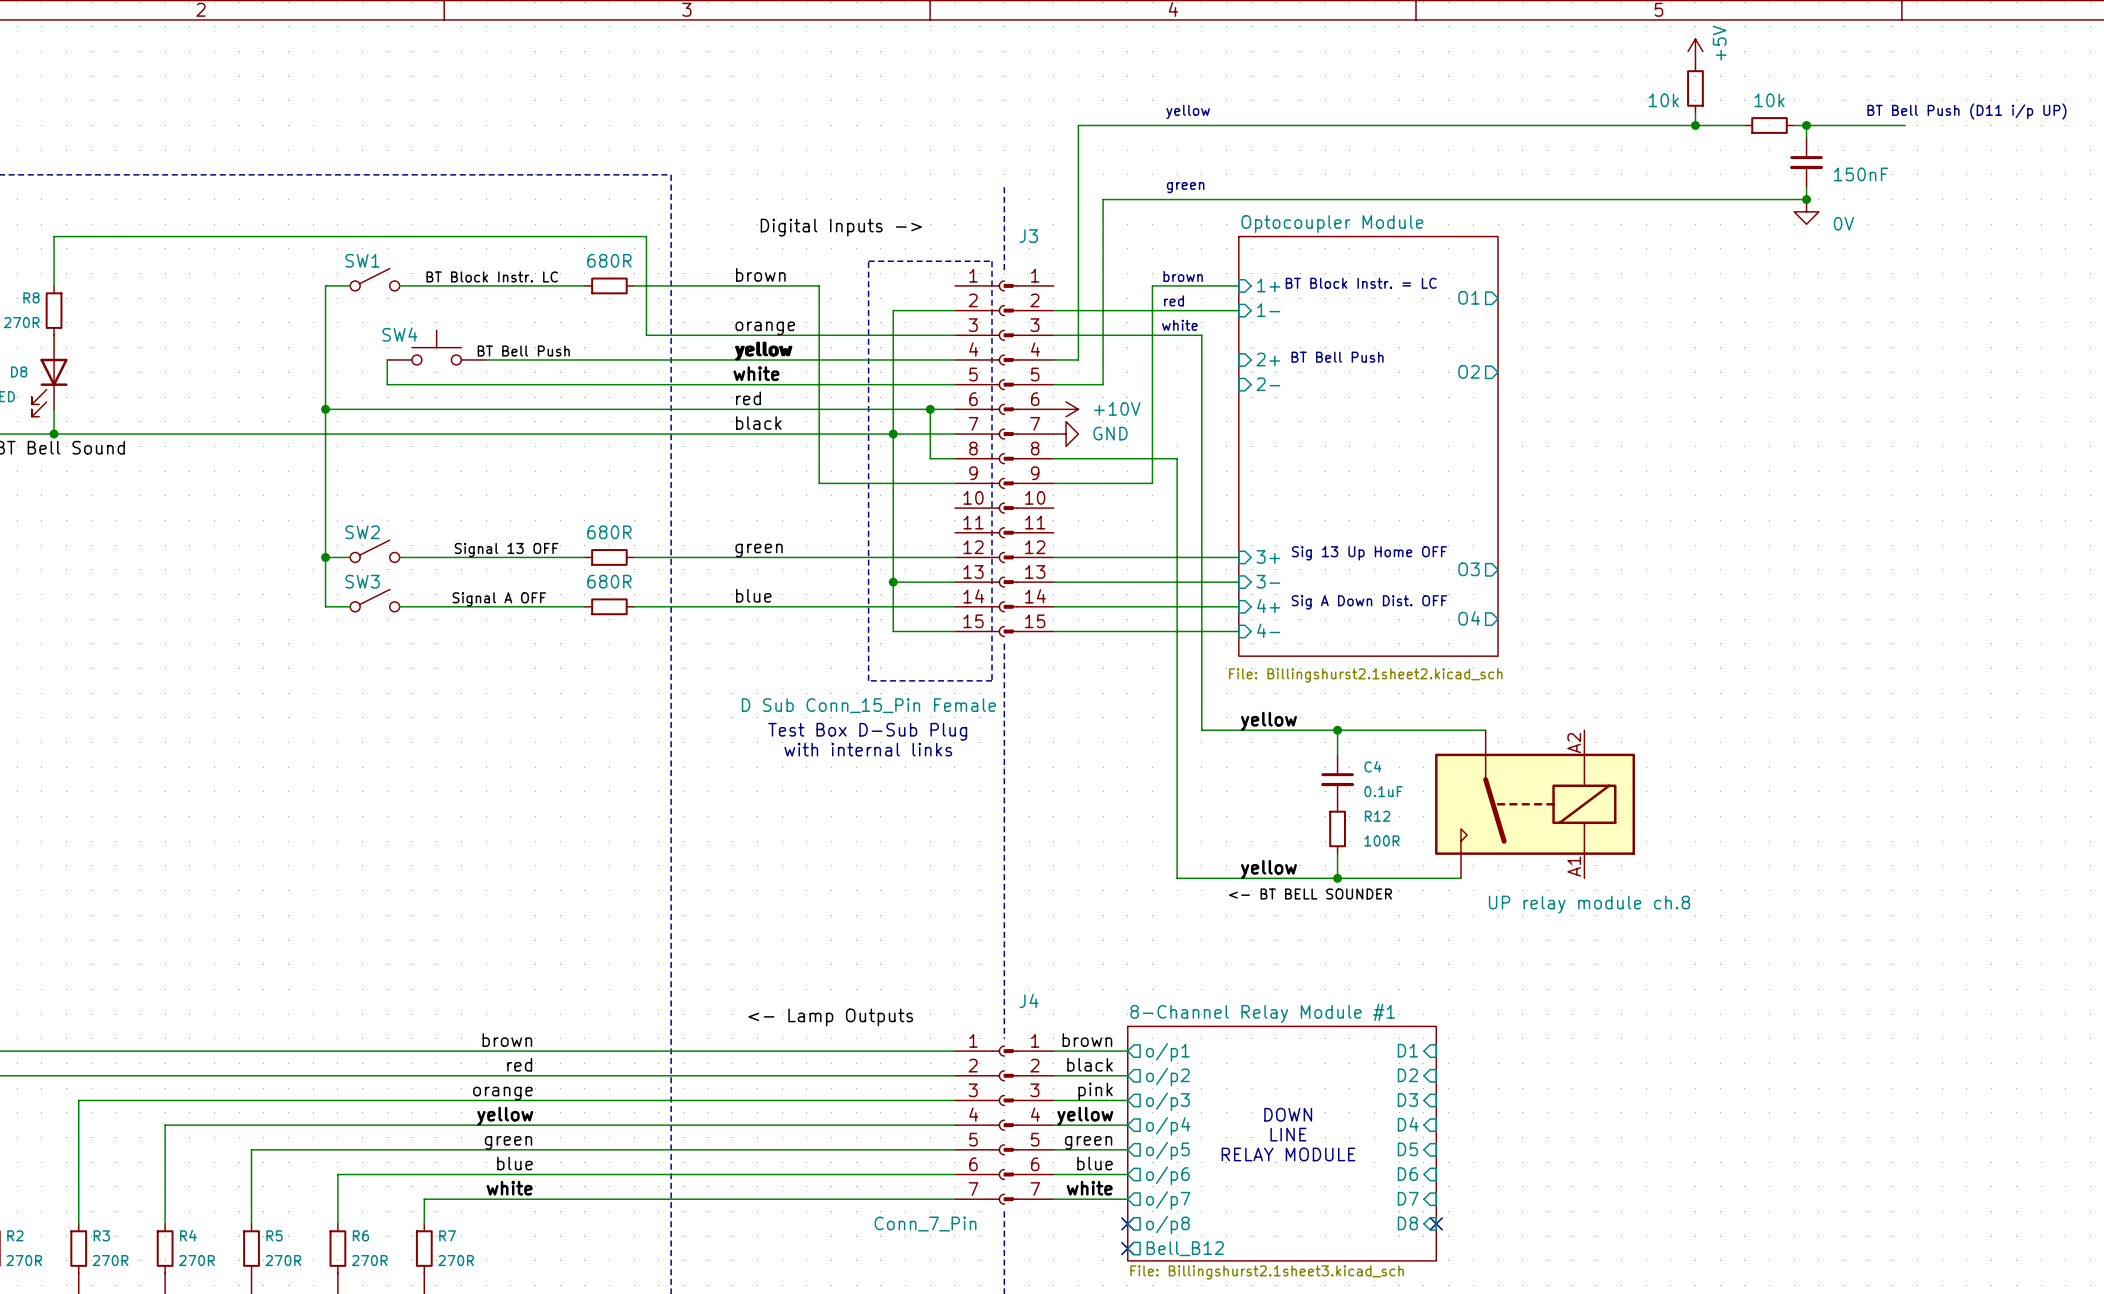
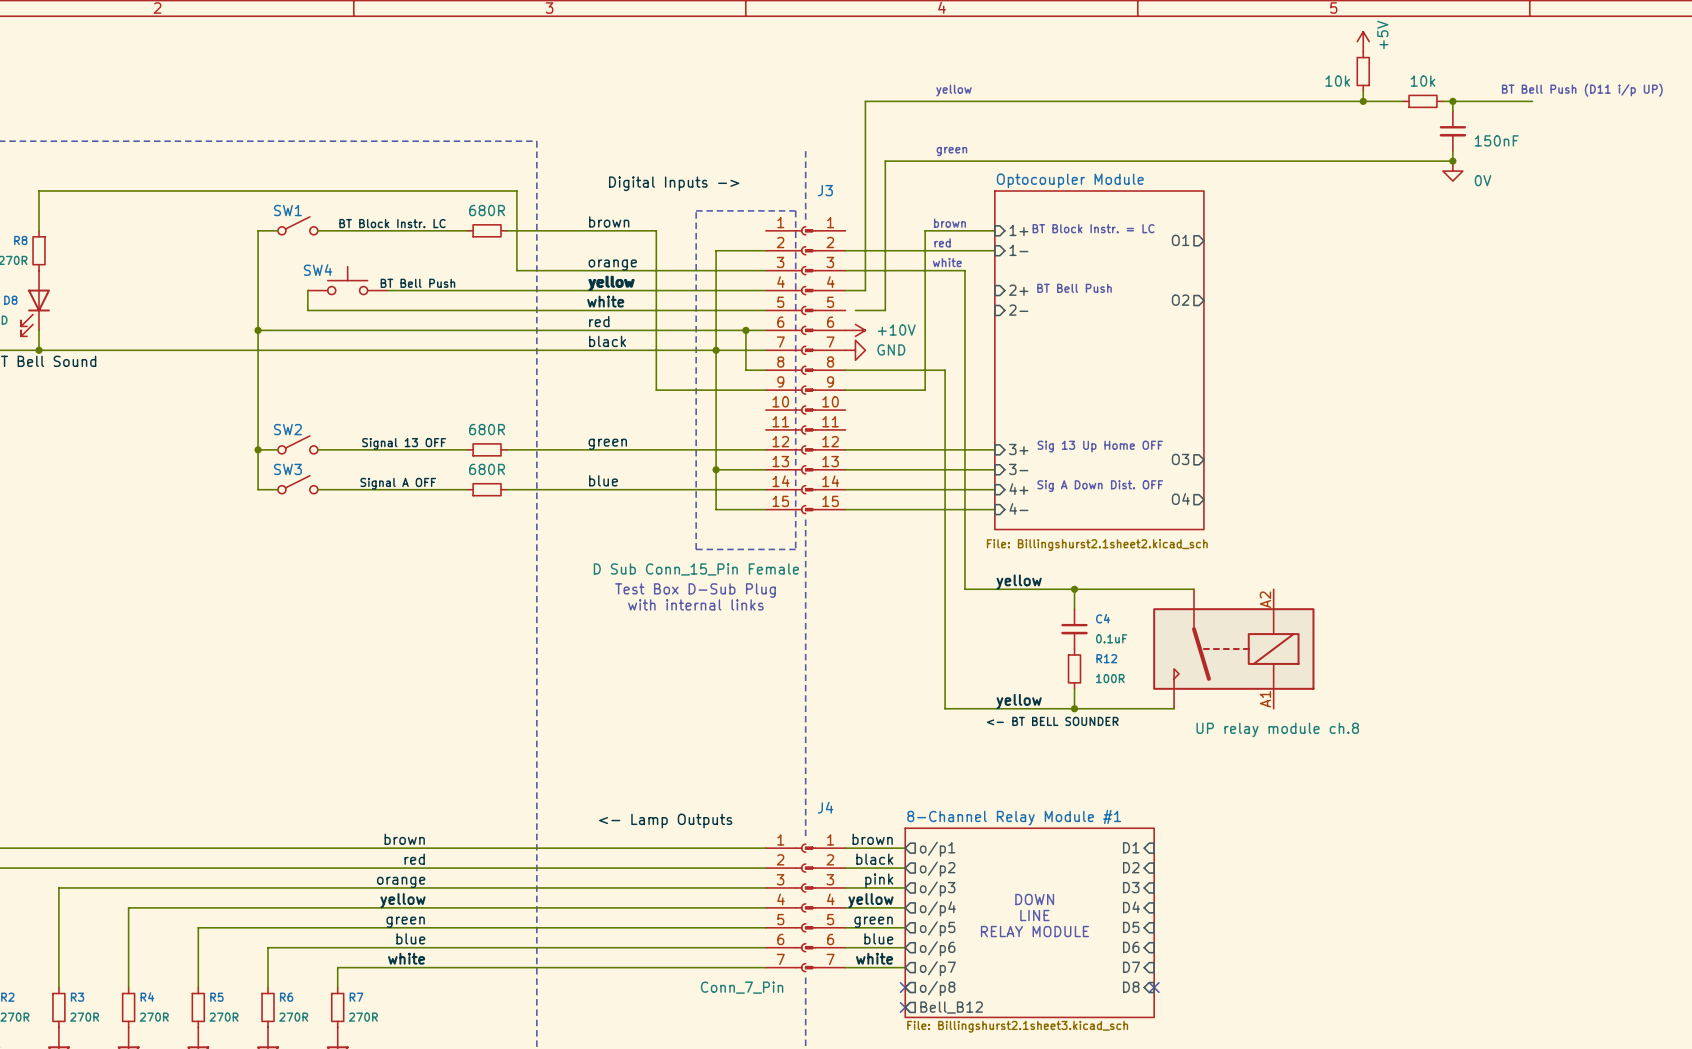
wire: (1053, 384) (1066, 384) -> none

